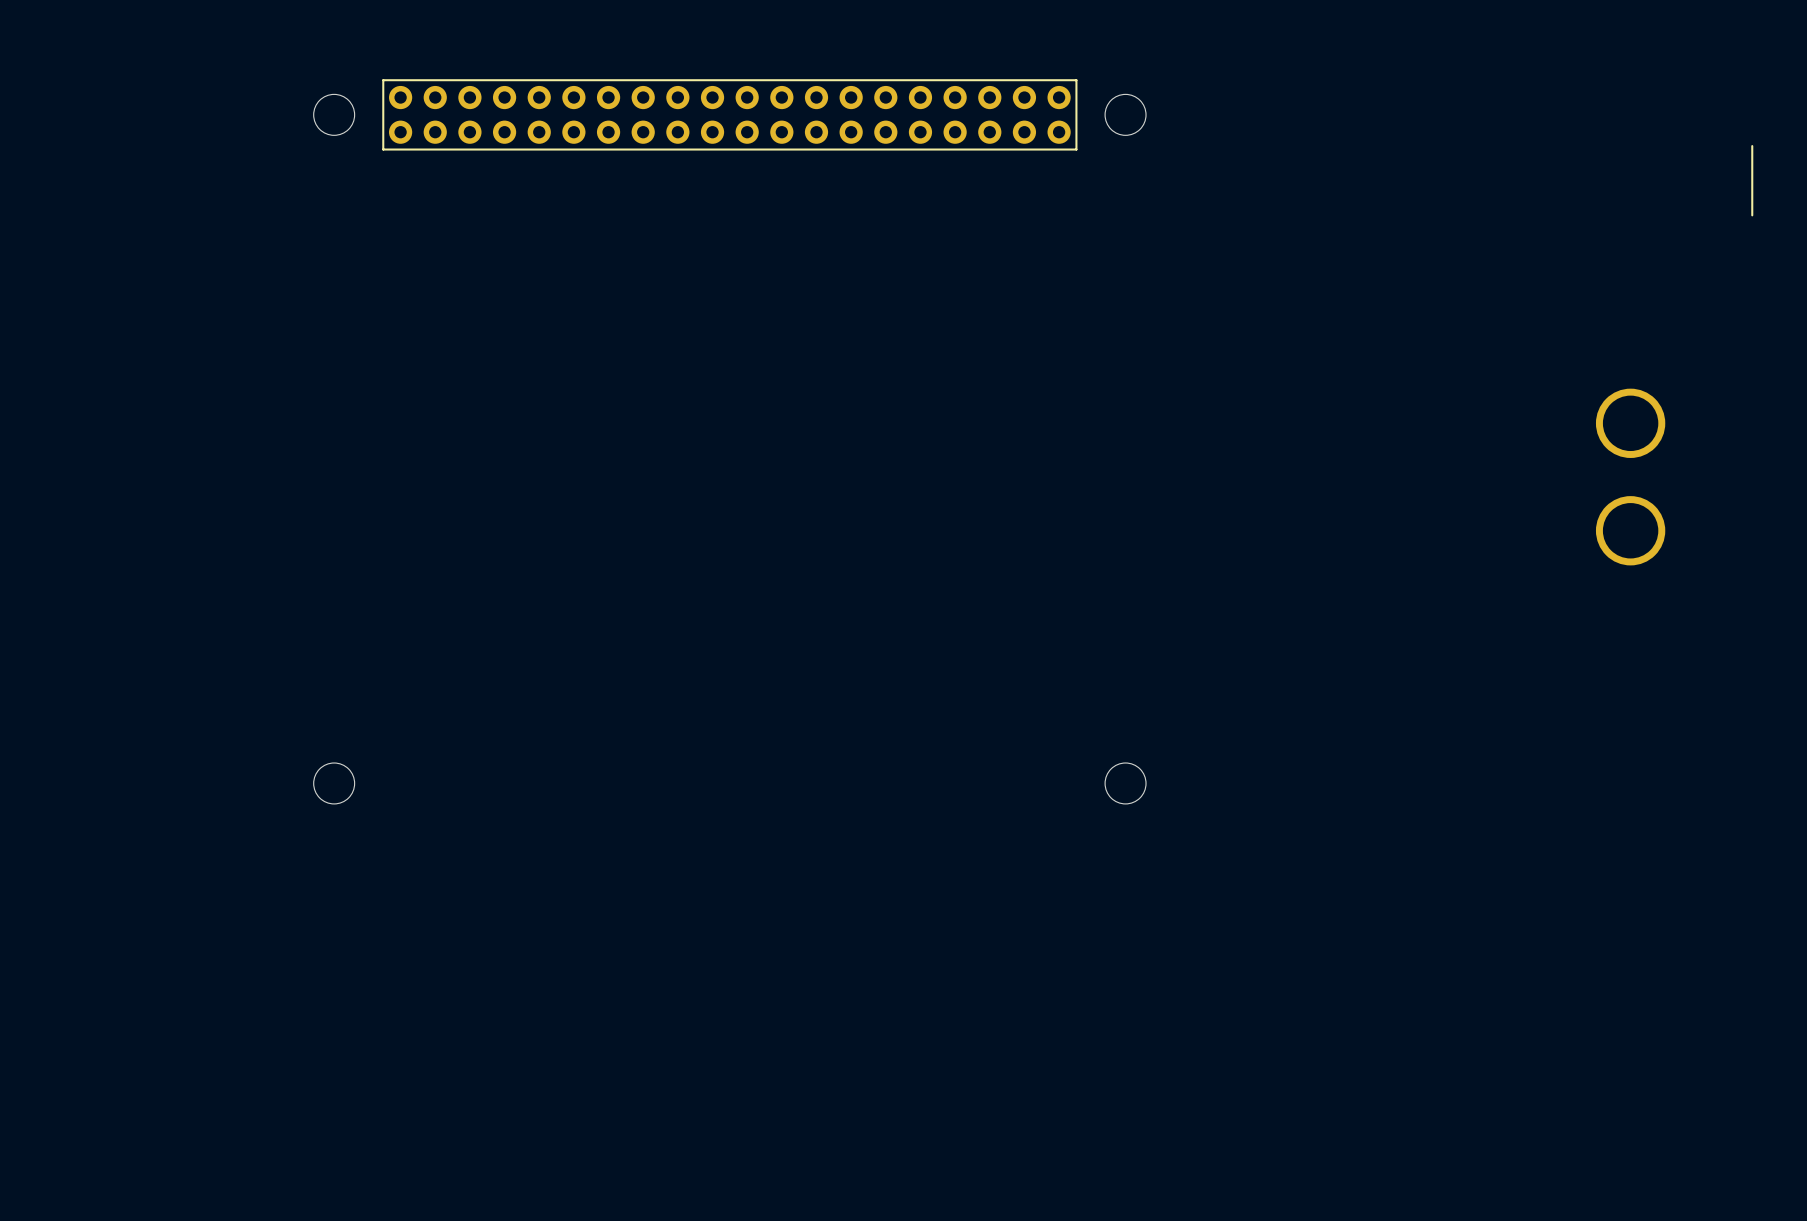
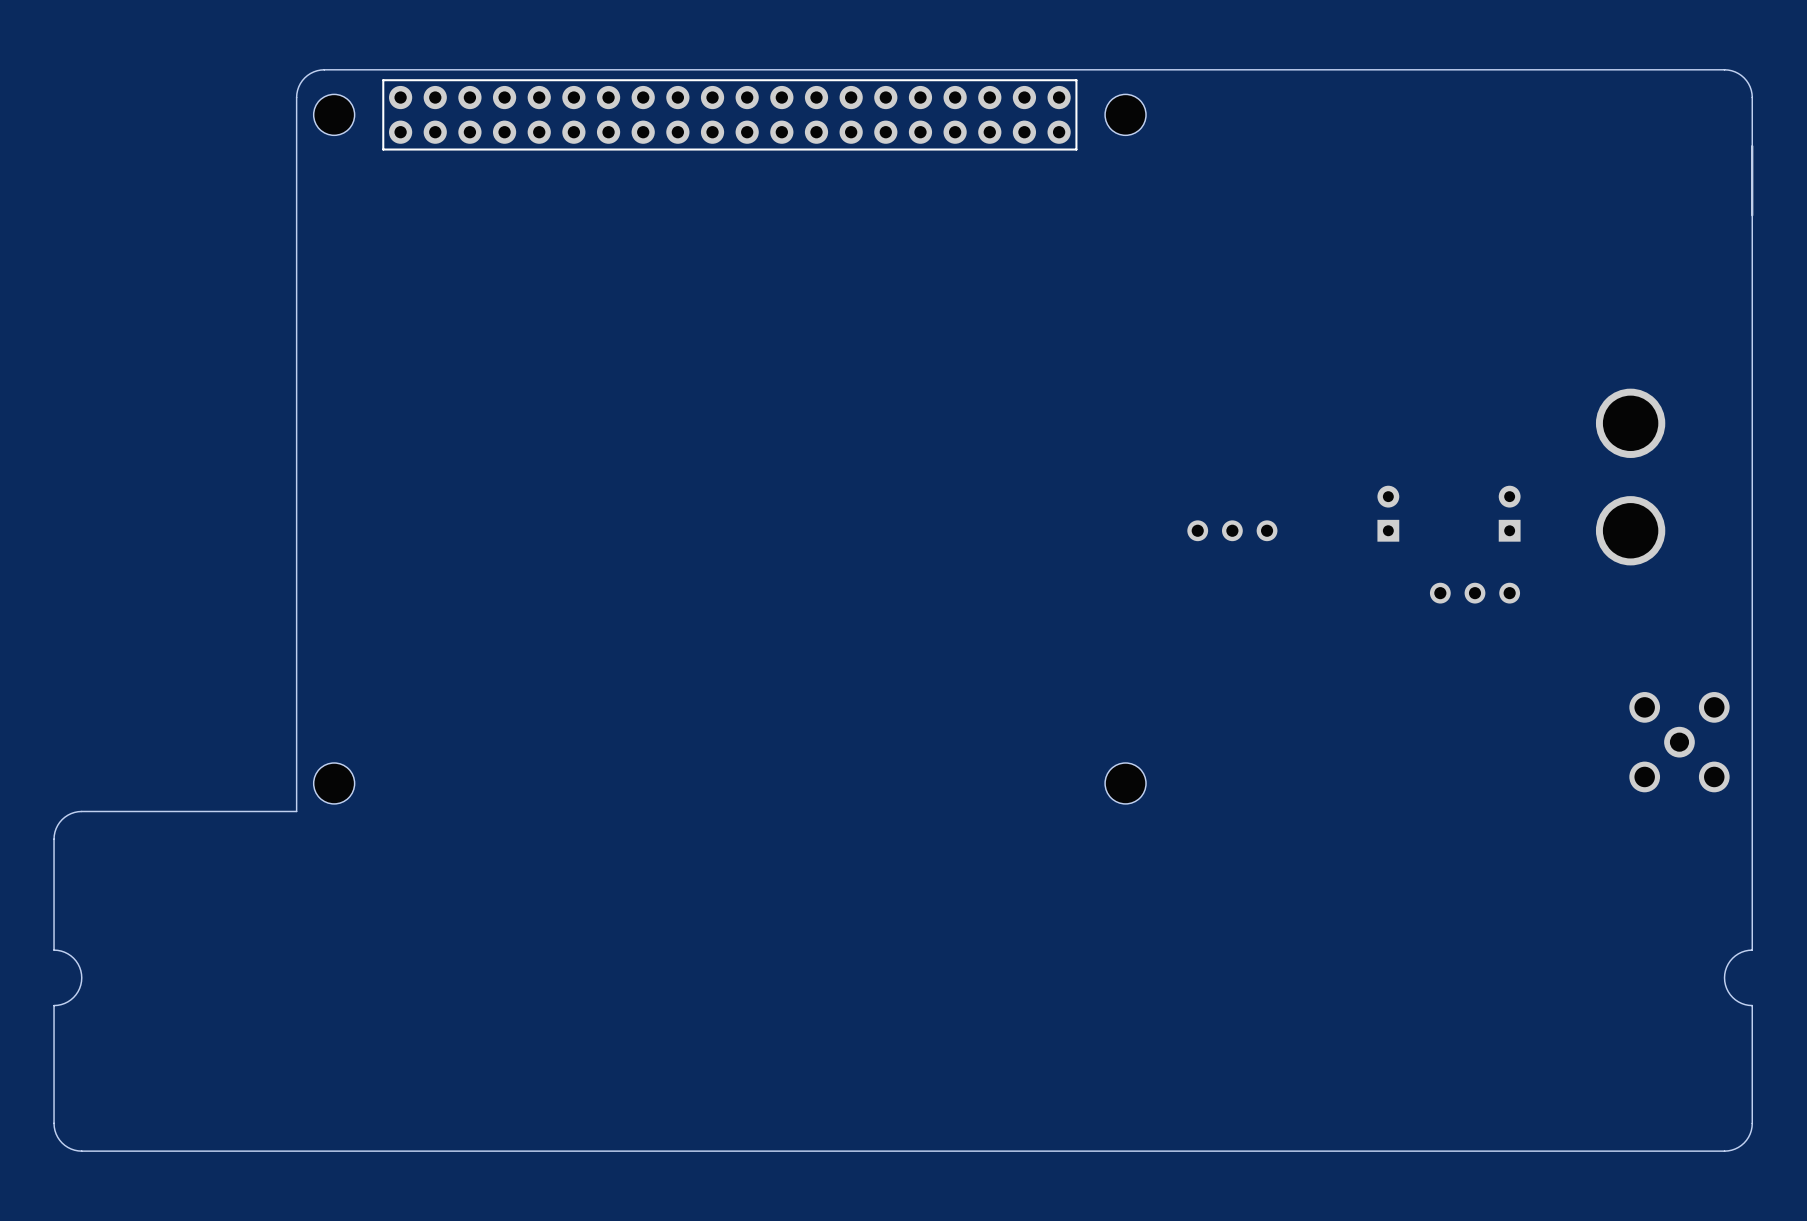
board edge: none -> (1724, 69) (324, 69) (310, 73) (300, 83) (296, 97) (296, 811) (81, 811) (67, 815) (59, 822) (54, 839) (54, 950) (64, 952) (73, 958) (79, 967) (81, 977) (79, 988) (73, 997) (64, 1003) (54, 1005) (54, 1123) (57, 1137) (67, 1147) (81, 1151) (1724, 1151) (1738, 1147) (1748, 1137) (1752, 1127) (1752, 1005) (1741, 1003) (1732, 997) (1726, 988) (1724, 977) (1726, 967) (1732, 958) (1741, 952) (1752, 950) (1752, 97) (1750, 86) (1744, 77) (1735, 71) (1724, 69)
part: none -> (1388, 513)
part: none -> (1509, 513)
part: none -> (1232, 530)
part: none -> (1474, 593)
part: none -> (1679, 742)

